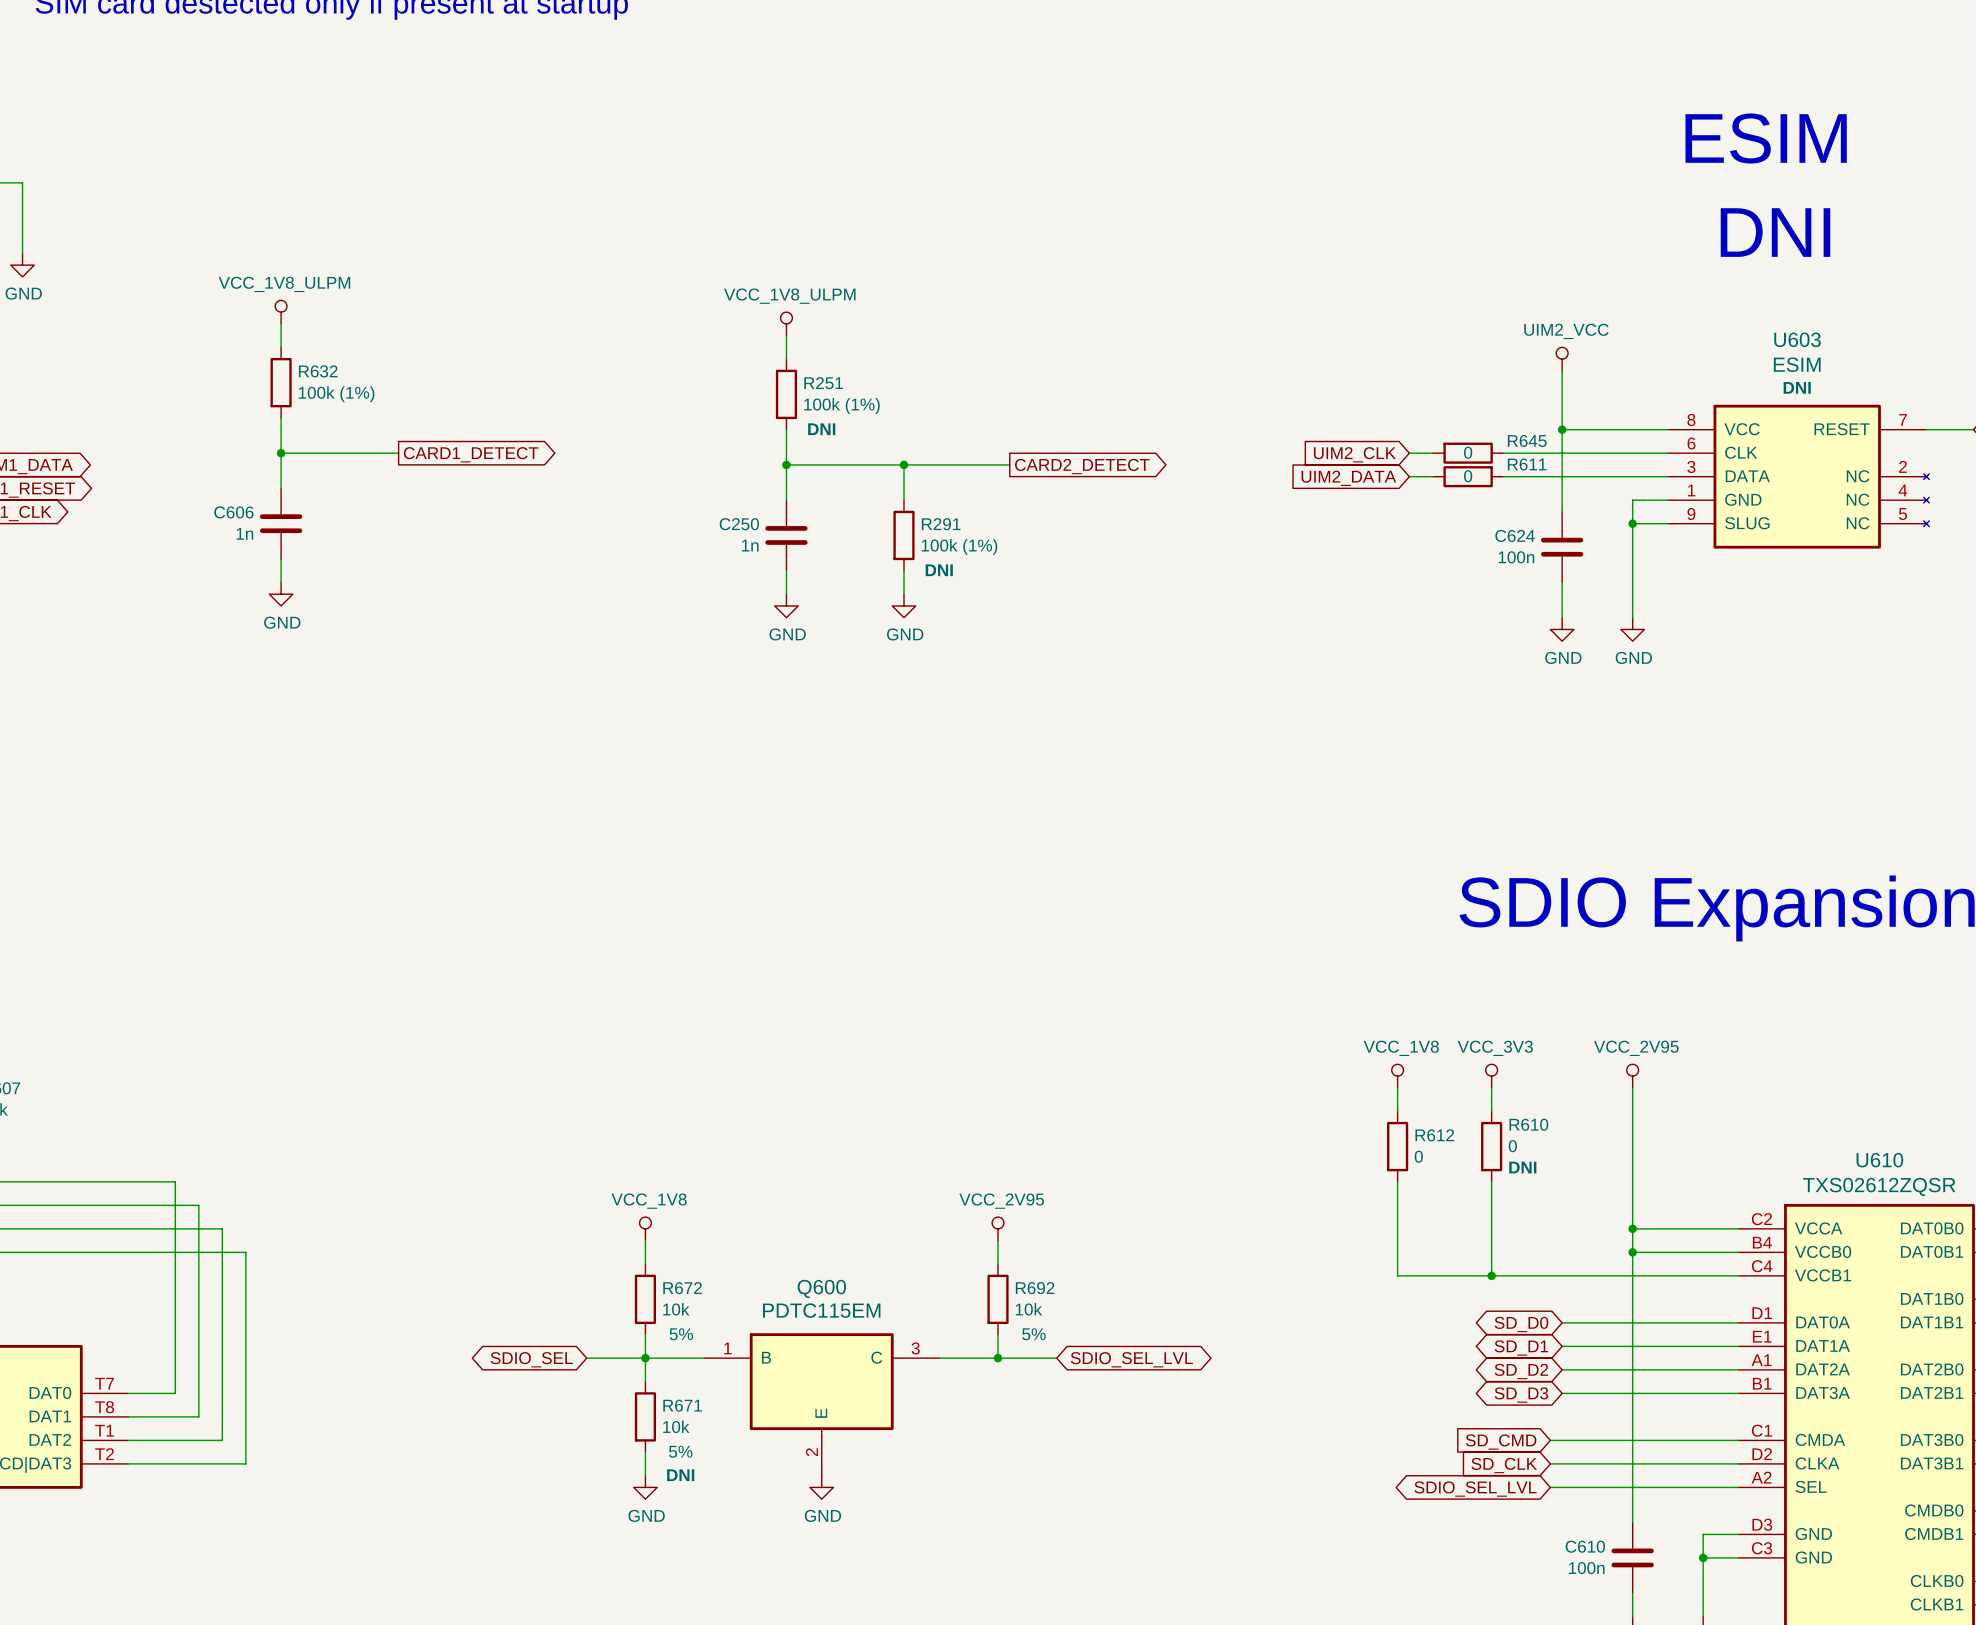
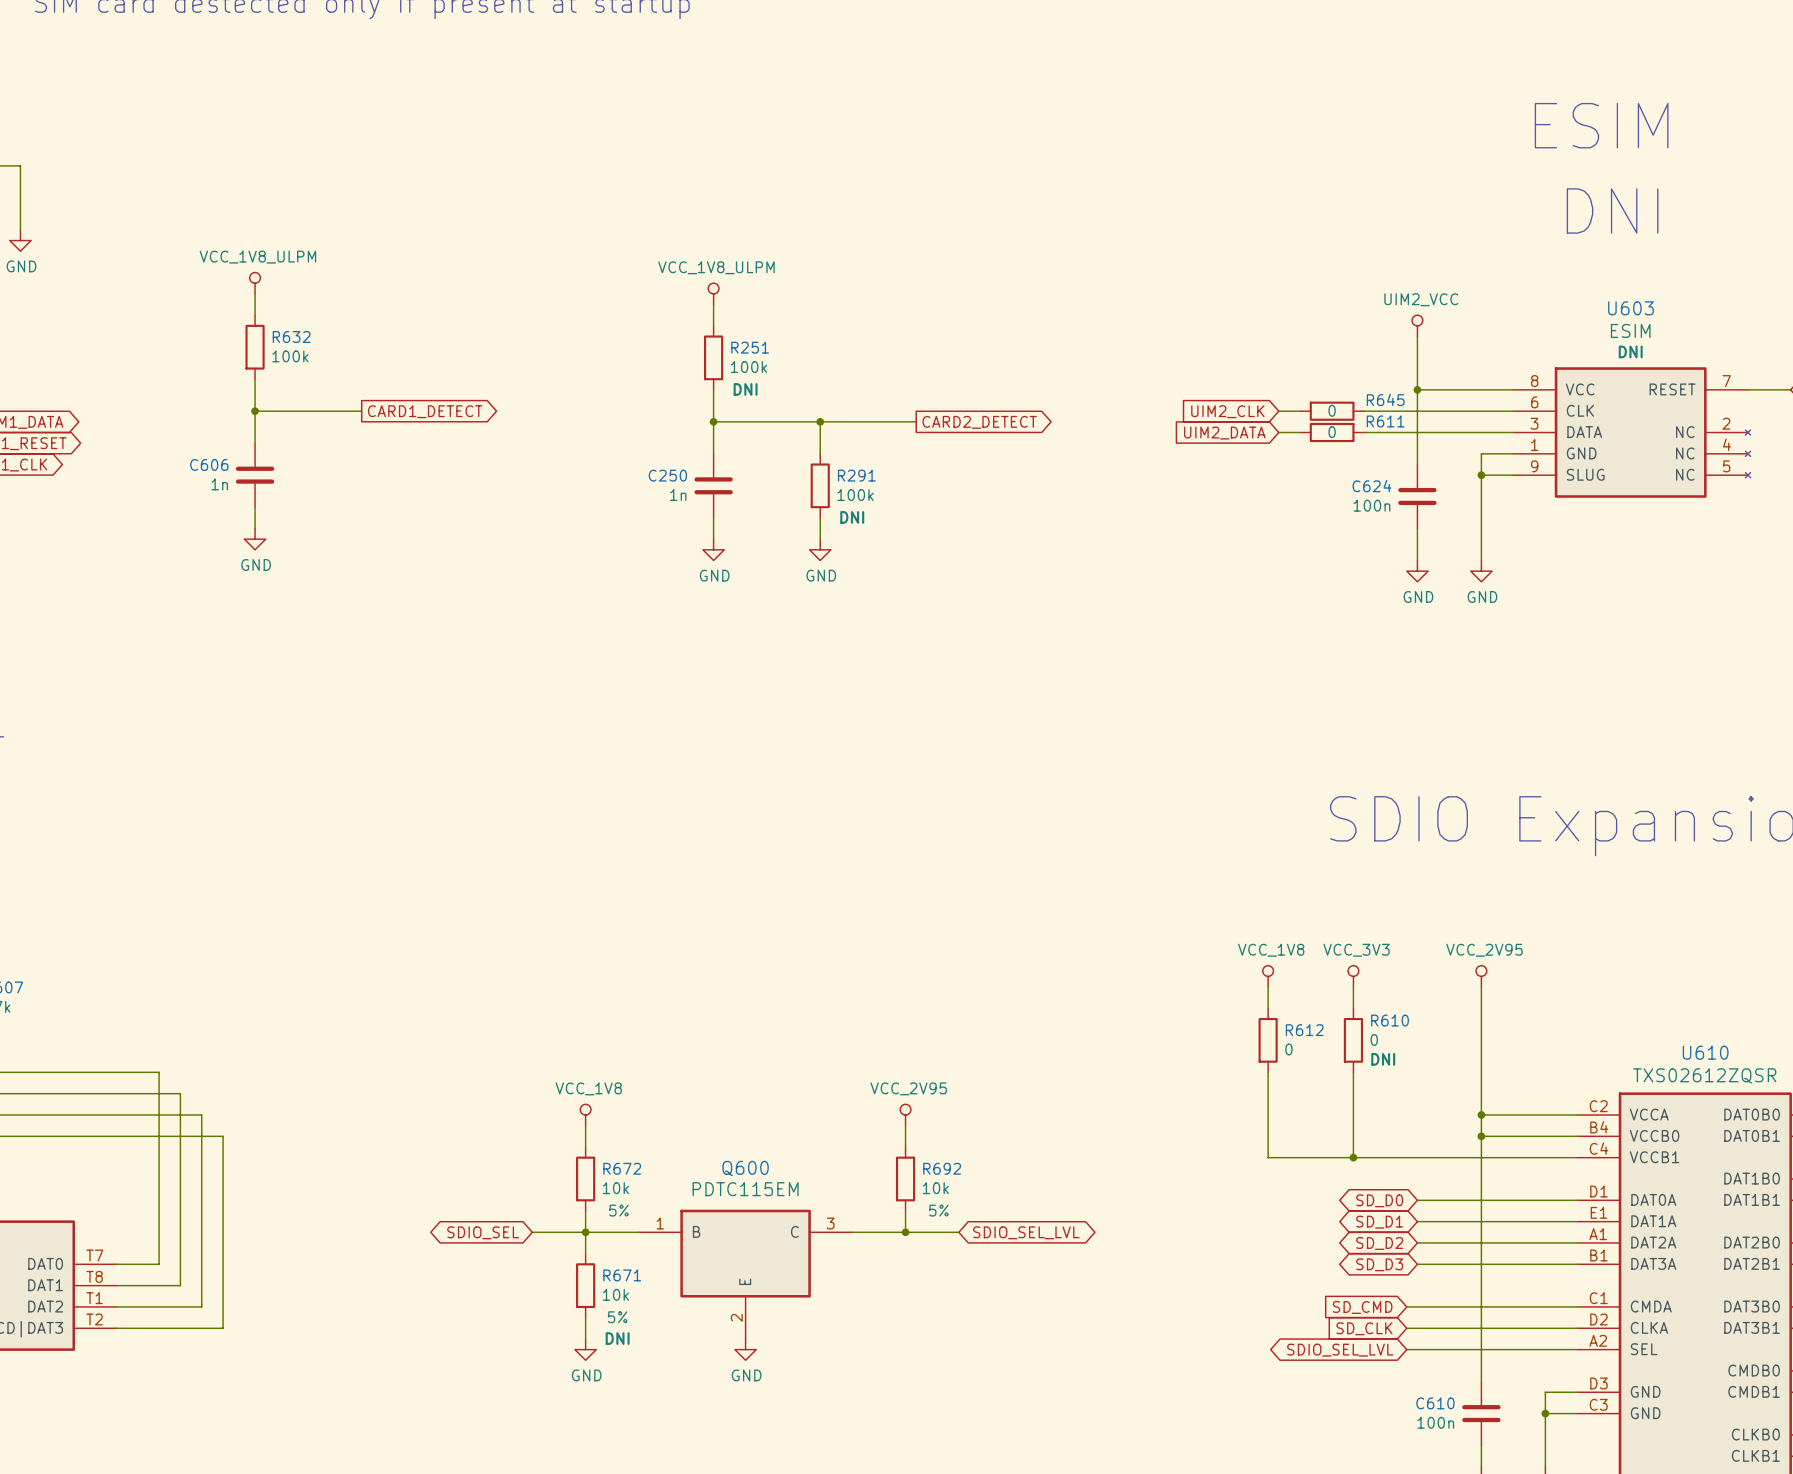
R632 value: 100k (1%) (336, 394) -> 100k (290, 356)
R251 value: 100k (1%) (841, 406) -> 100k (748, 367)
R291 value: 100k (1%) (959, 547) -> 100k (855, 495)

